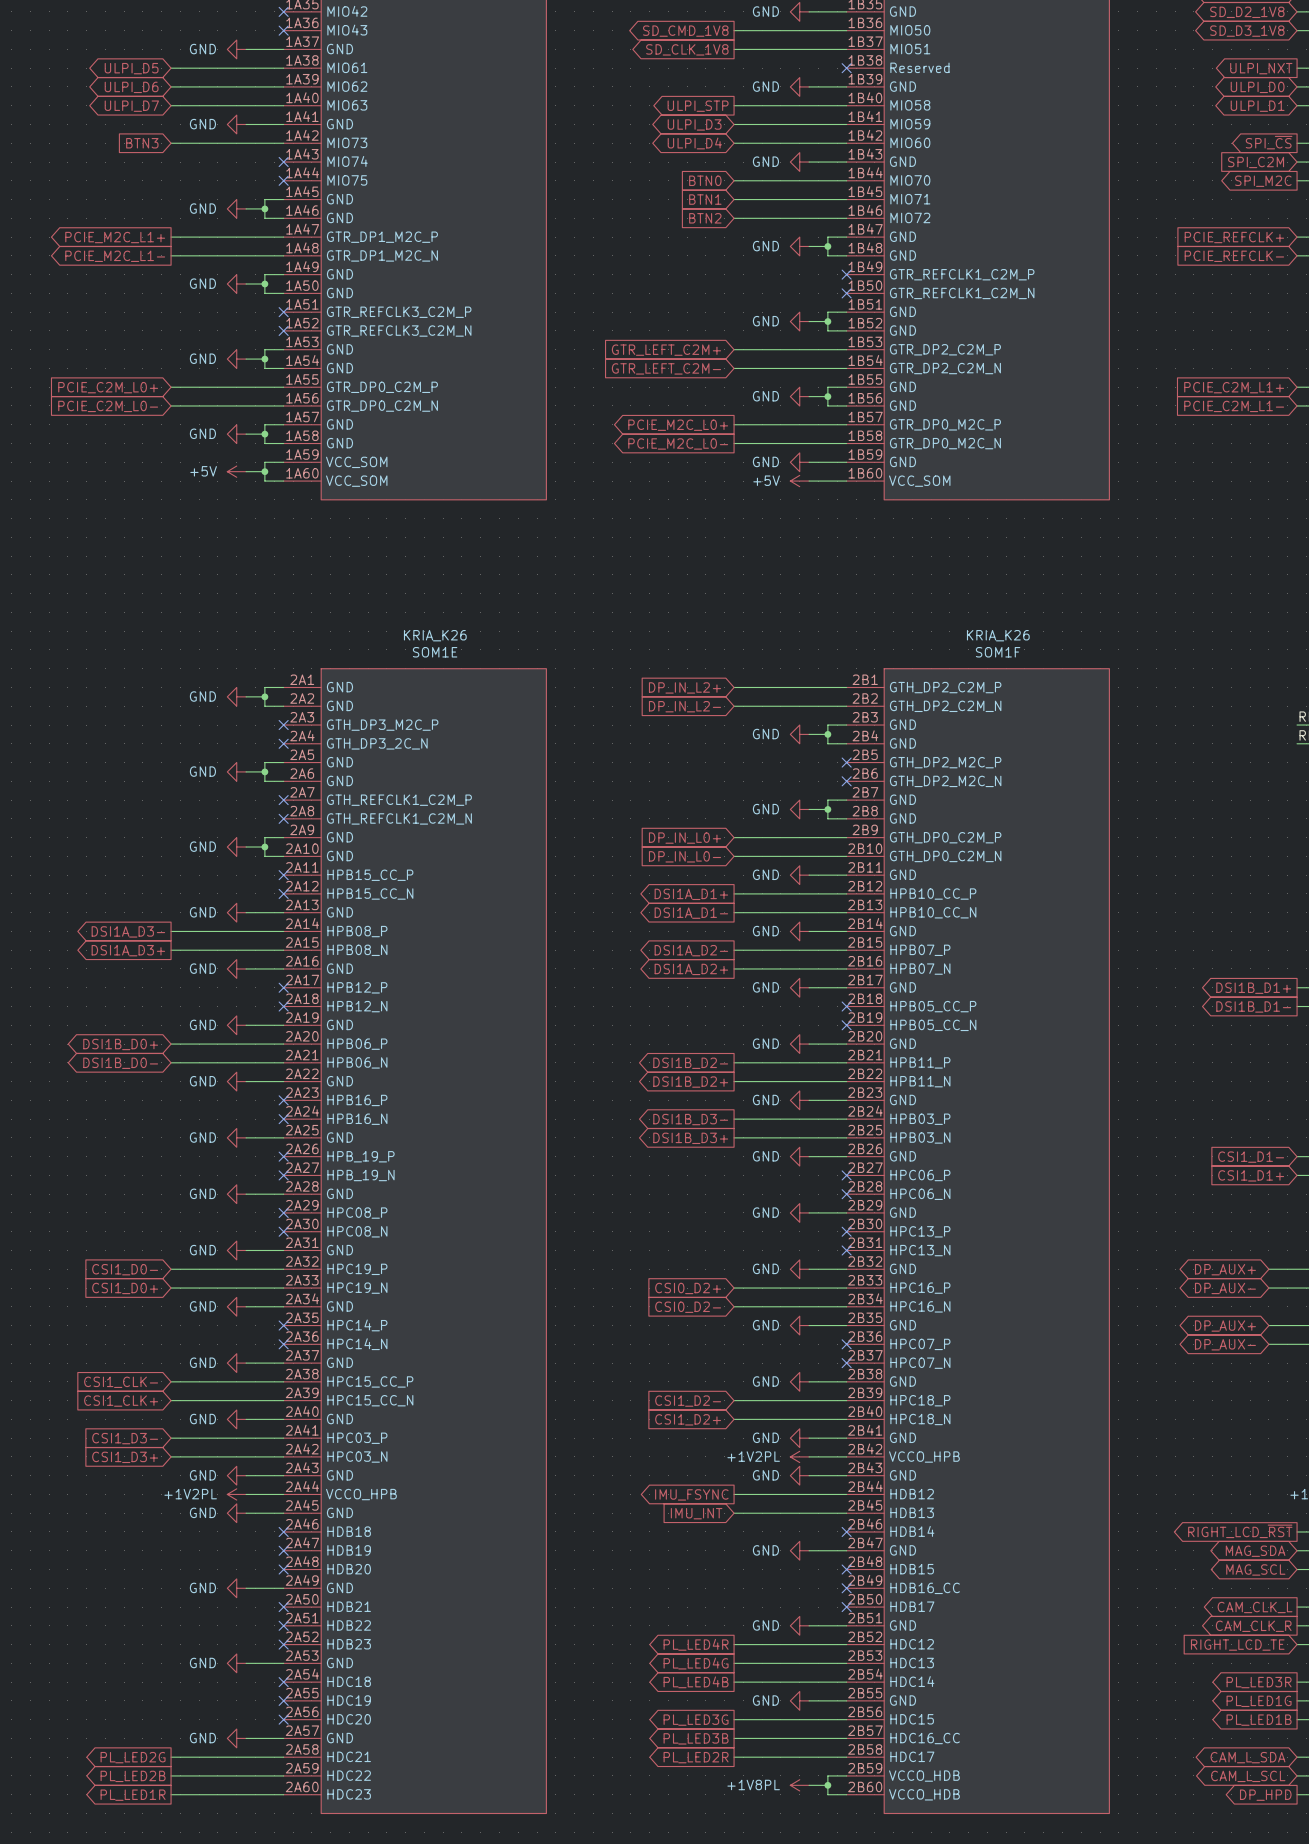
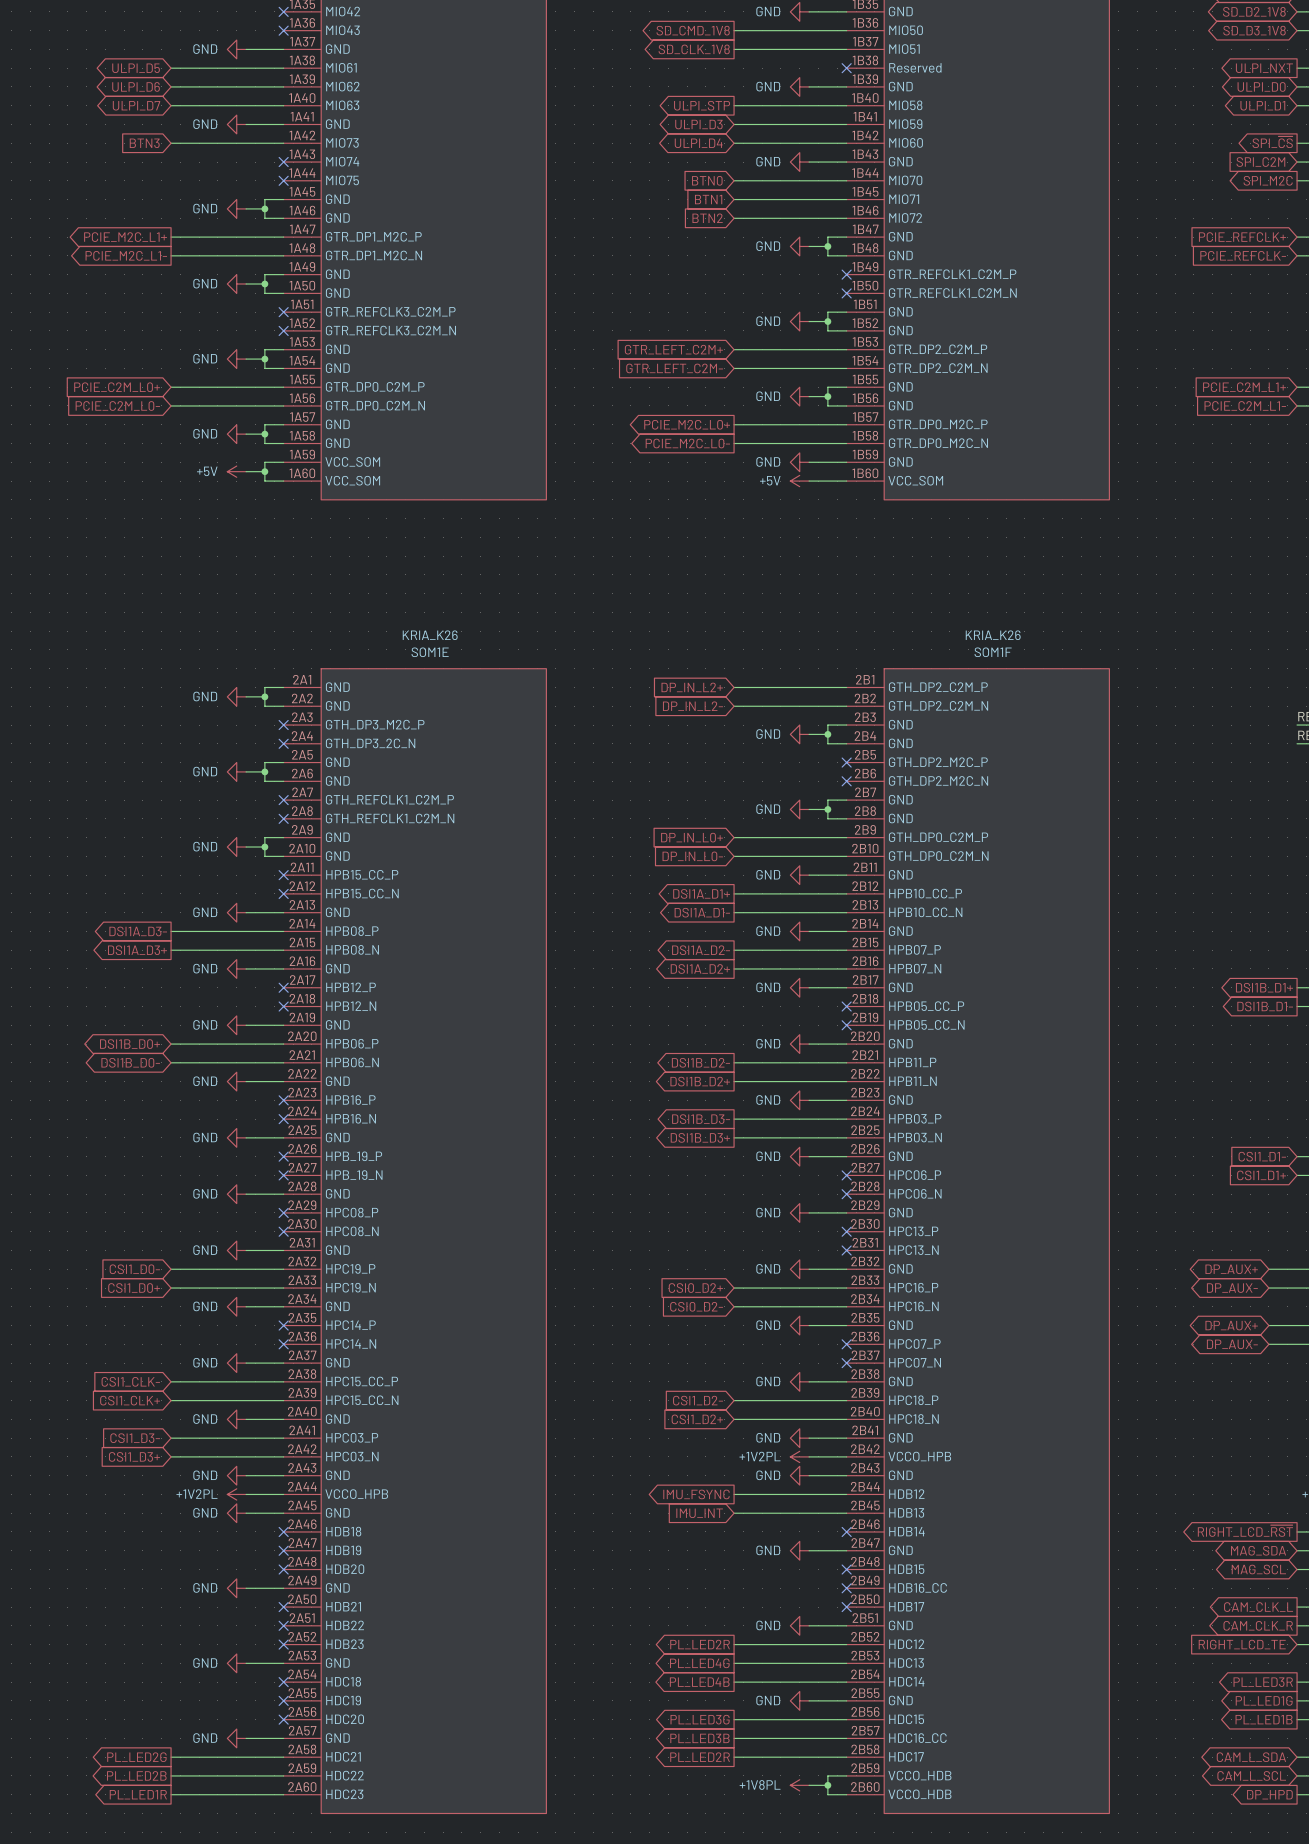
global label: PL_LED4R (696, 1644) -> PL_LED2R (700, 1644)

